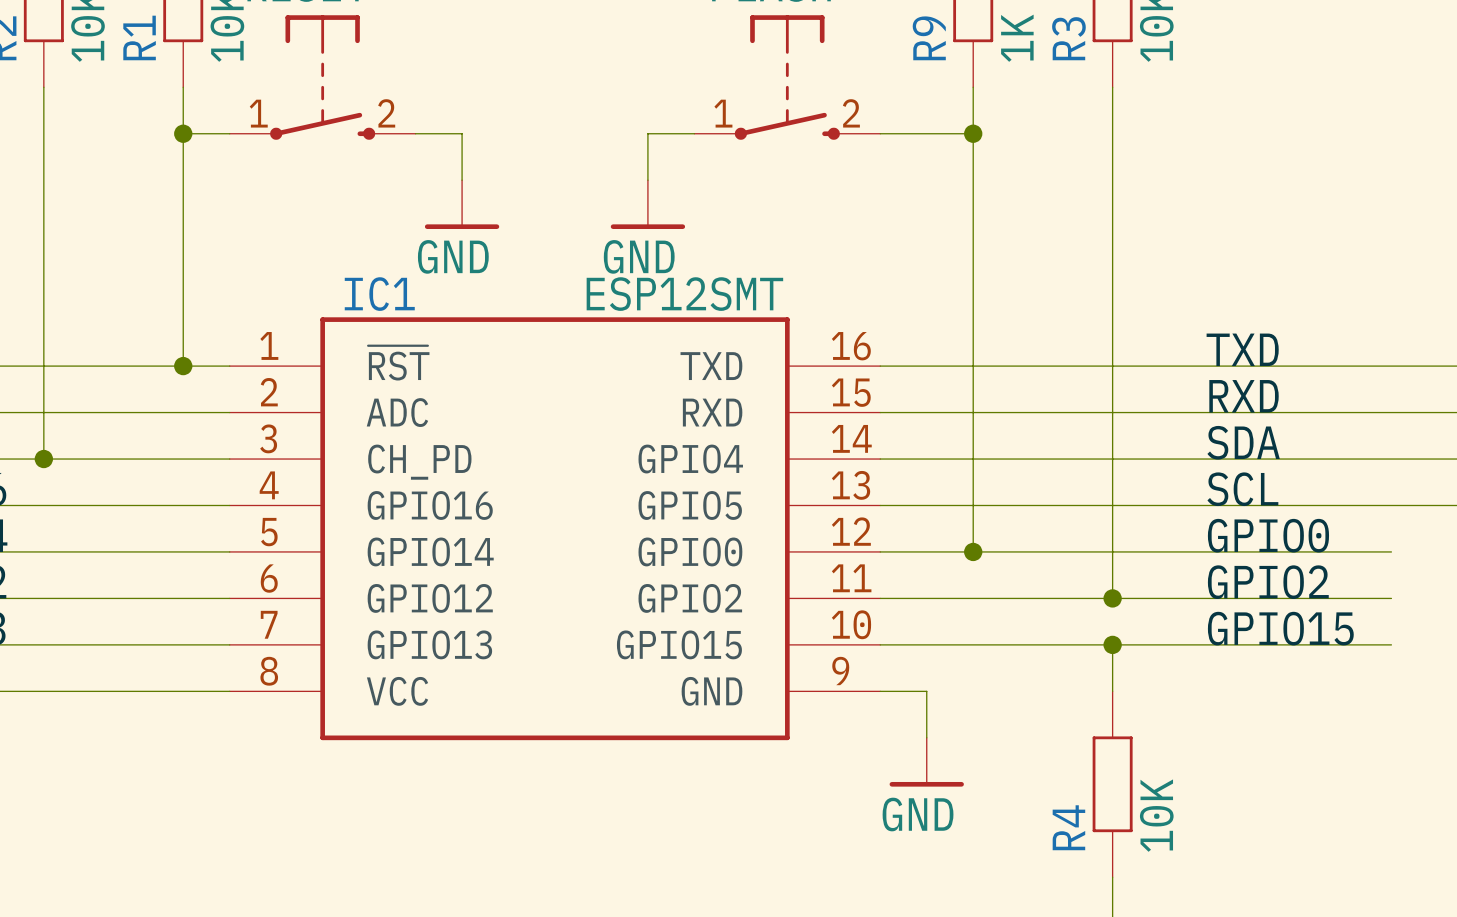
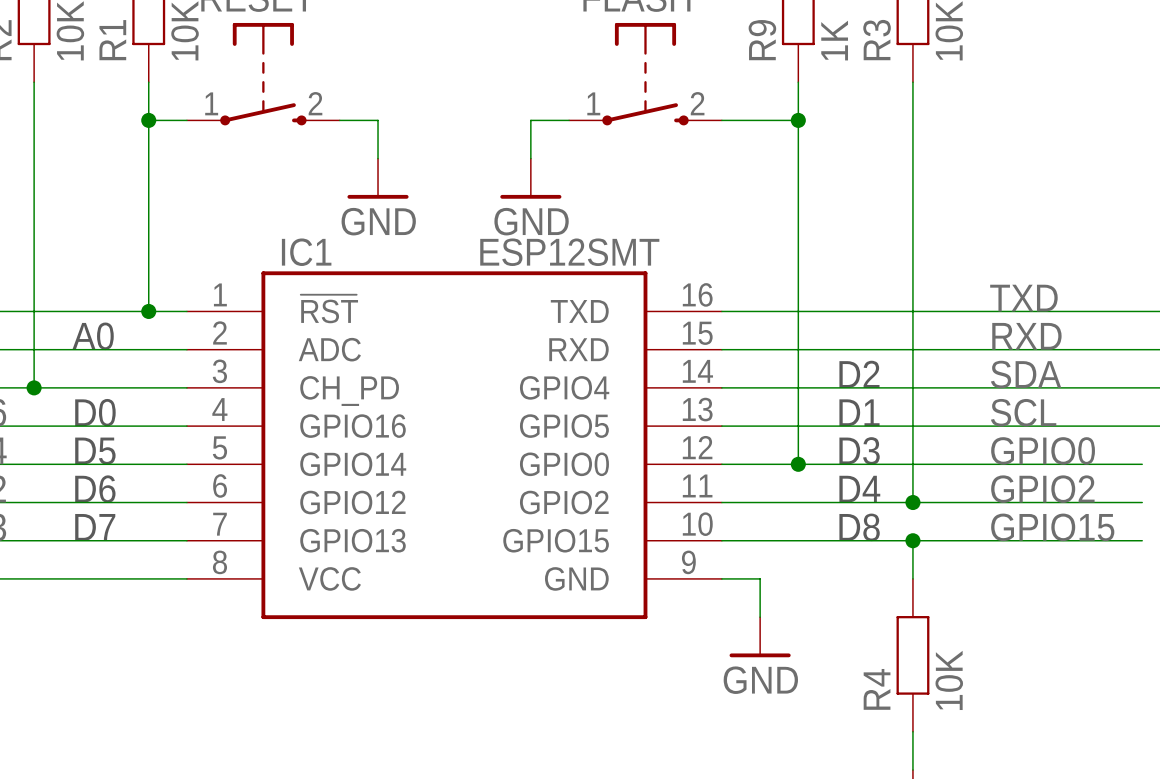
text: none -> A0 (93, 336)
text: none -> D2 (859, 374)
text: none -> D0 (95, 412)
text: none -> D1 (859, 412)
text: none -> D5 (95, 451)
text: none -> D3 (859, 450)
text: none -> D6 (95, 489)
text: none -> D4 (859, 489)
text: none -> D7 (95, 527)
text: none -> D8 (859, 527)

